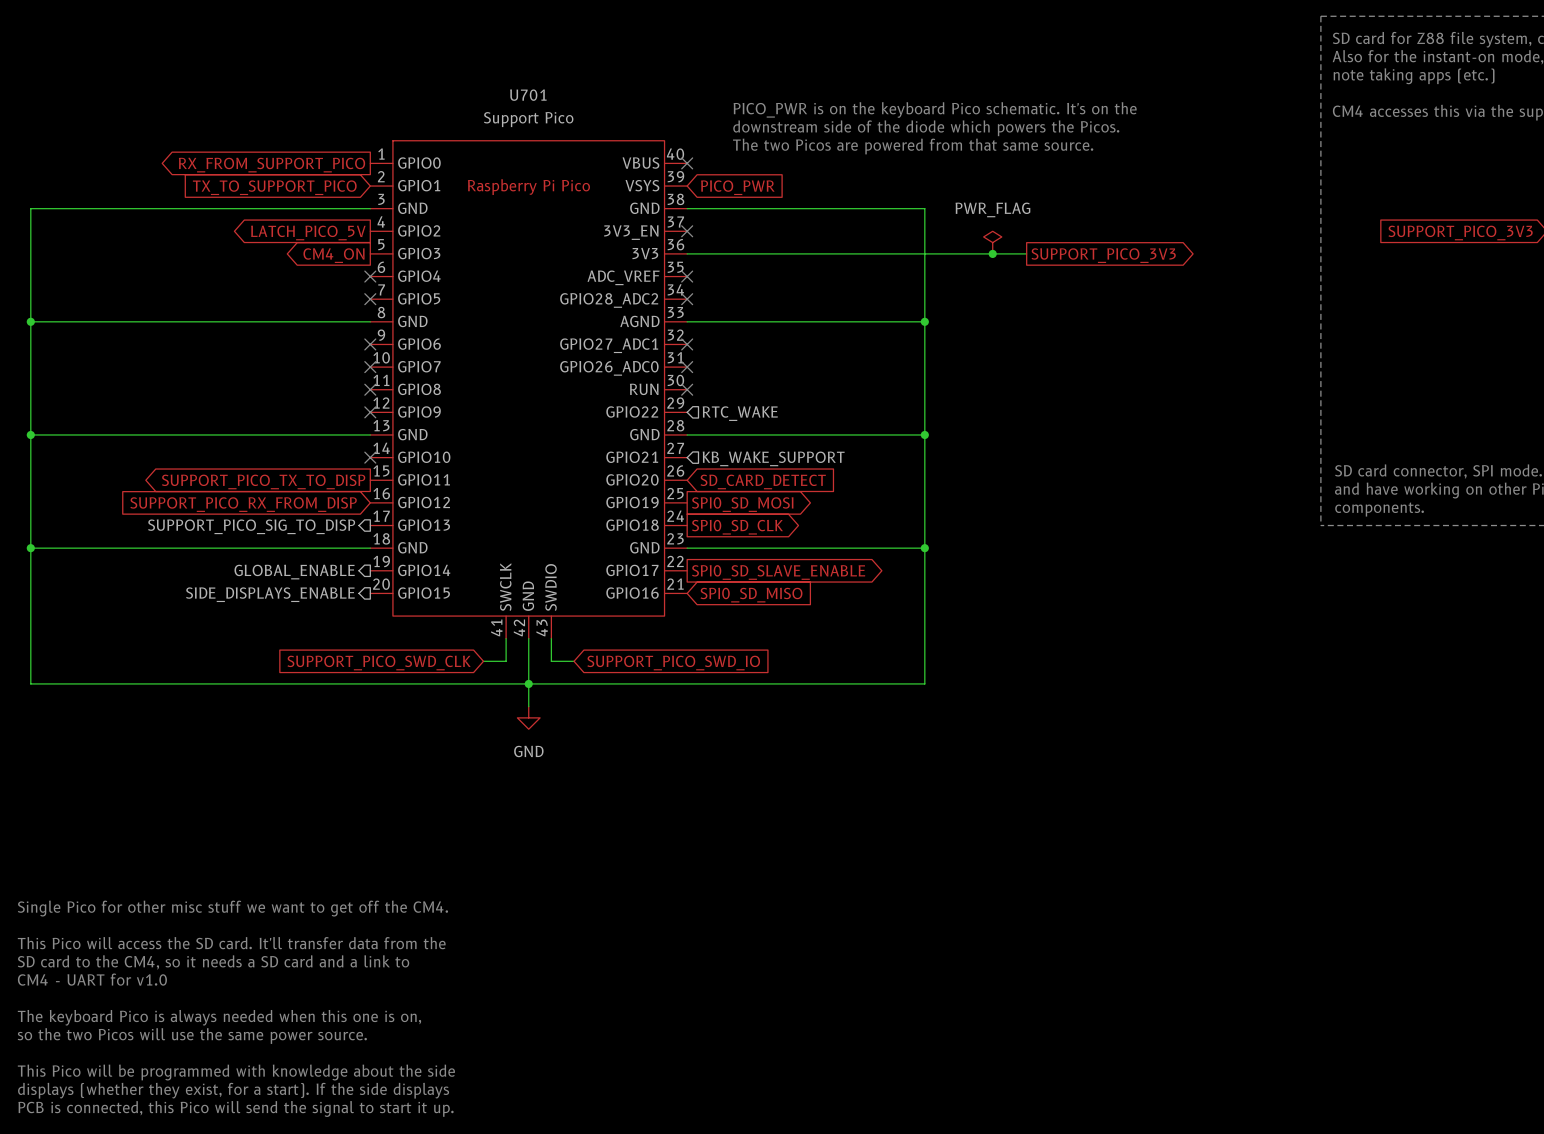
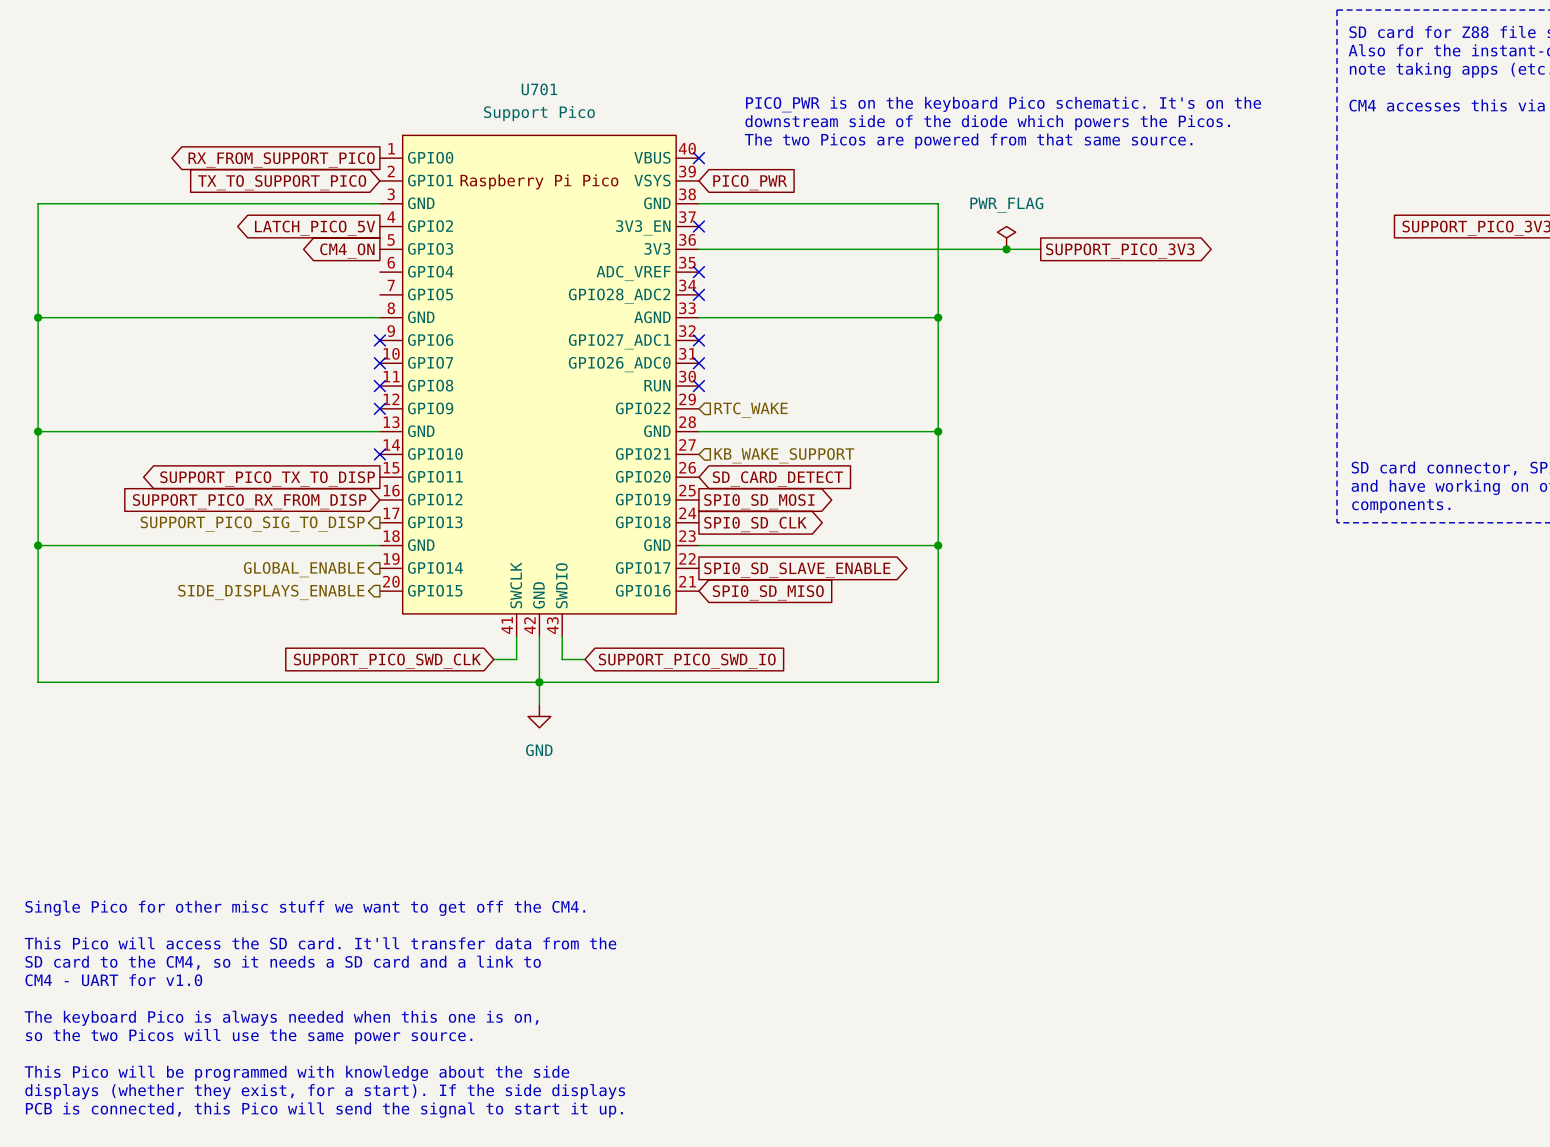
no-connect mark: (370, 276) -> none
no-connect mark: (370, 299) -> none

